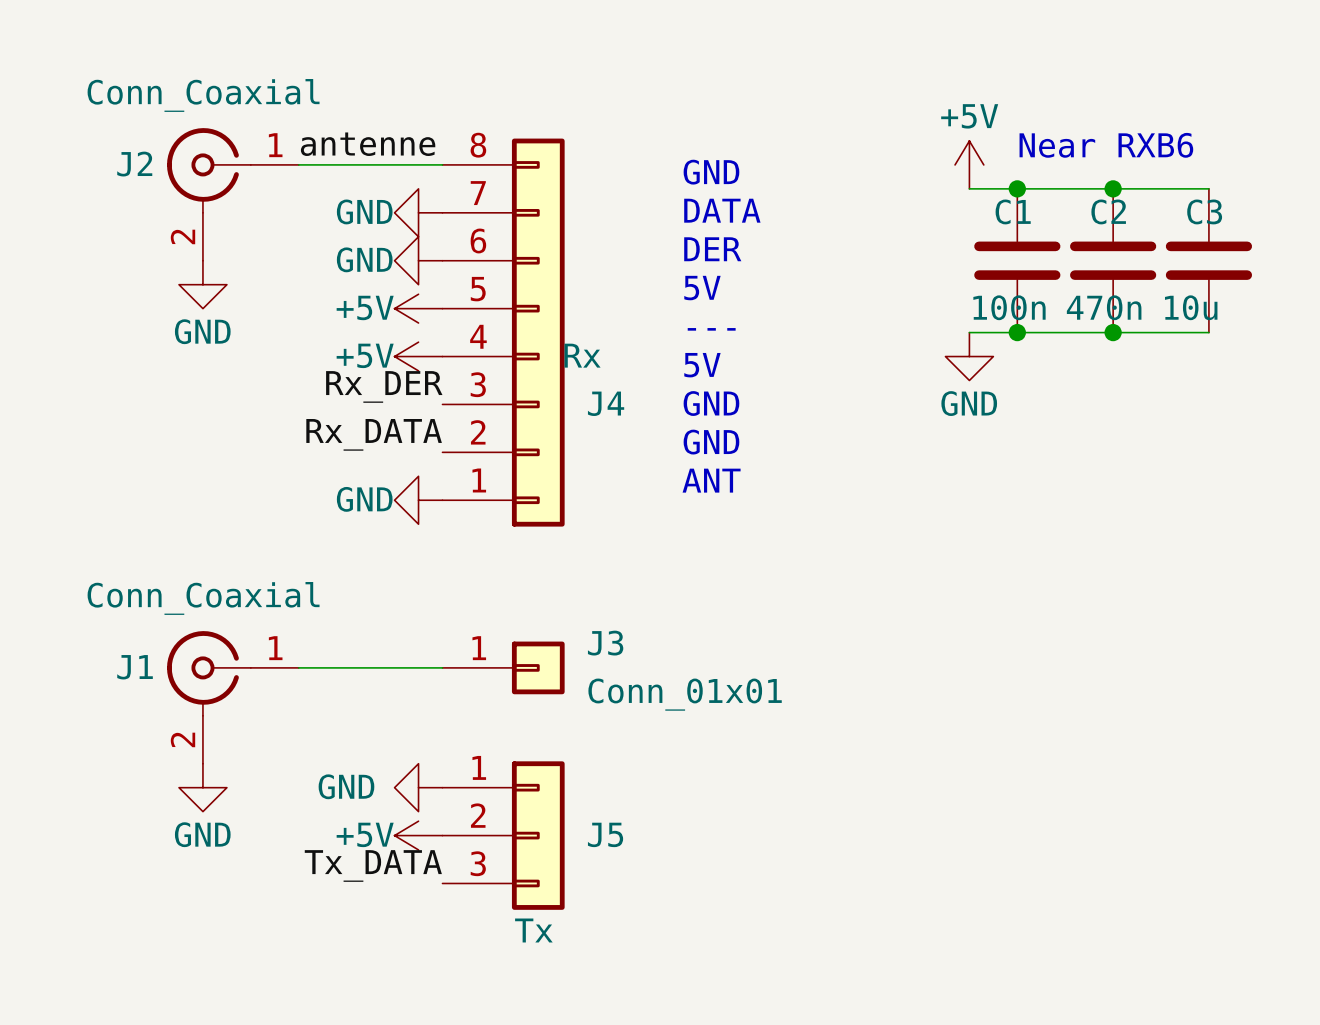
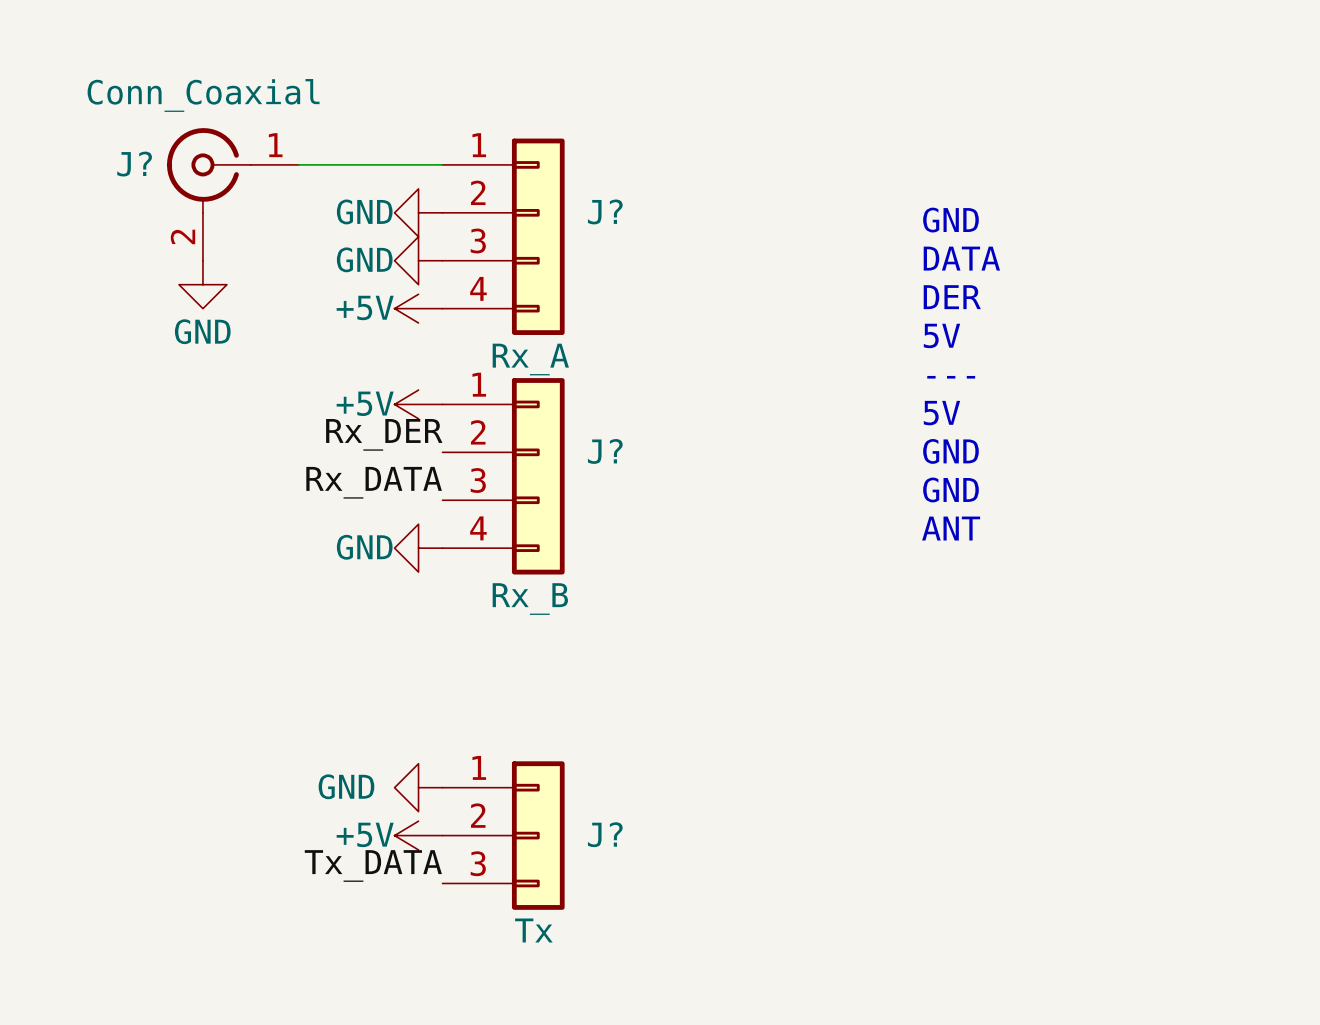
label: antenne (368, 144) -> none
text: Near RXB6 (1106, 145) -> none
J2 name: J2 (134, 164) -> J? (134, 164)
power symbol: +5V (969, 164) -> none
text: GND (711, 172) -> none
wire: (969, 188) (1208, 188) -> none
junction: (1017, 188) -> none
junction: (1113, 188) -> none
text position: DATA (722, 210) -> DATA (961, 258)
text: none -> GND (950, 220)
J?: none -> Rx_A (503, 236)
text position: DER (712, 249) -> DER (952, 297)
C1: 100n (1017, 260) -> none
C2: 470n (1113, 260) -> none
C3: 10u (1208, 260) -> none
text: 5V (702, 288) -> none
text position: --- (711, 329) -> --- (951, 377)
J4: Rx (503, 332) -> none
wire: (969, 332) (1208, 332) -> none
junction: (1017, 332) -> none
junction: (1113, 332) -> none
text: none -> 5V (941, 335)
power symbol position: +5V (418, 356) -> +5V (418, 404)
power symbol: GND (969, 356) -> none
text: 5V (702, 365) -> none
label: Rx_DER (384, 386) -> none
text: GND (711, 403) -> none
text: none -> 5V (941, 413)
label: Rx_DATA (374, 434) -> Rx_DER (384, 434)
text: GND (711, 442) -> none
text: none -> GND (950, 451)
J?: none -> Rx_B (503, 476)
text position: ANT (711, 480) -> ANT (951, 528)
label: none -> Rx_DATA (374, 482)
text: none -> GND (950, 489)
power symbol position: GND (418, 500) -> GND (418, 548)
wire: (298, 667) (442, 667) -> none
J3: Conn_01x01 (503, 667) -> none
J1: Conn_Coaxial (232, 697) -> none
power symbol: GND (202, 787) -> none
J5 name: J5 (605, 834) -> J? (605, 834)

